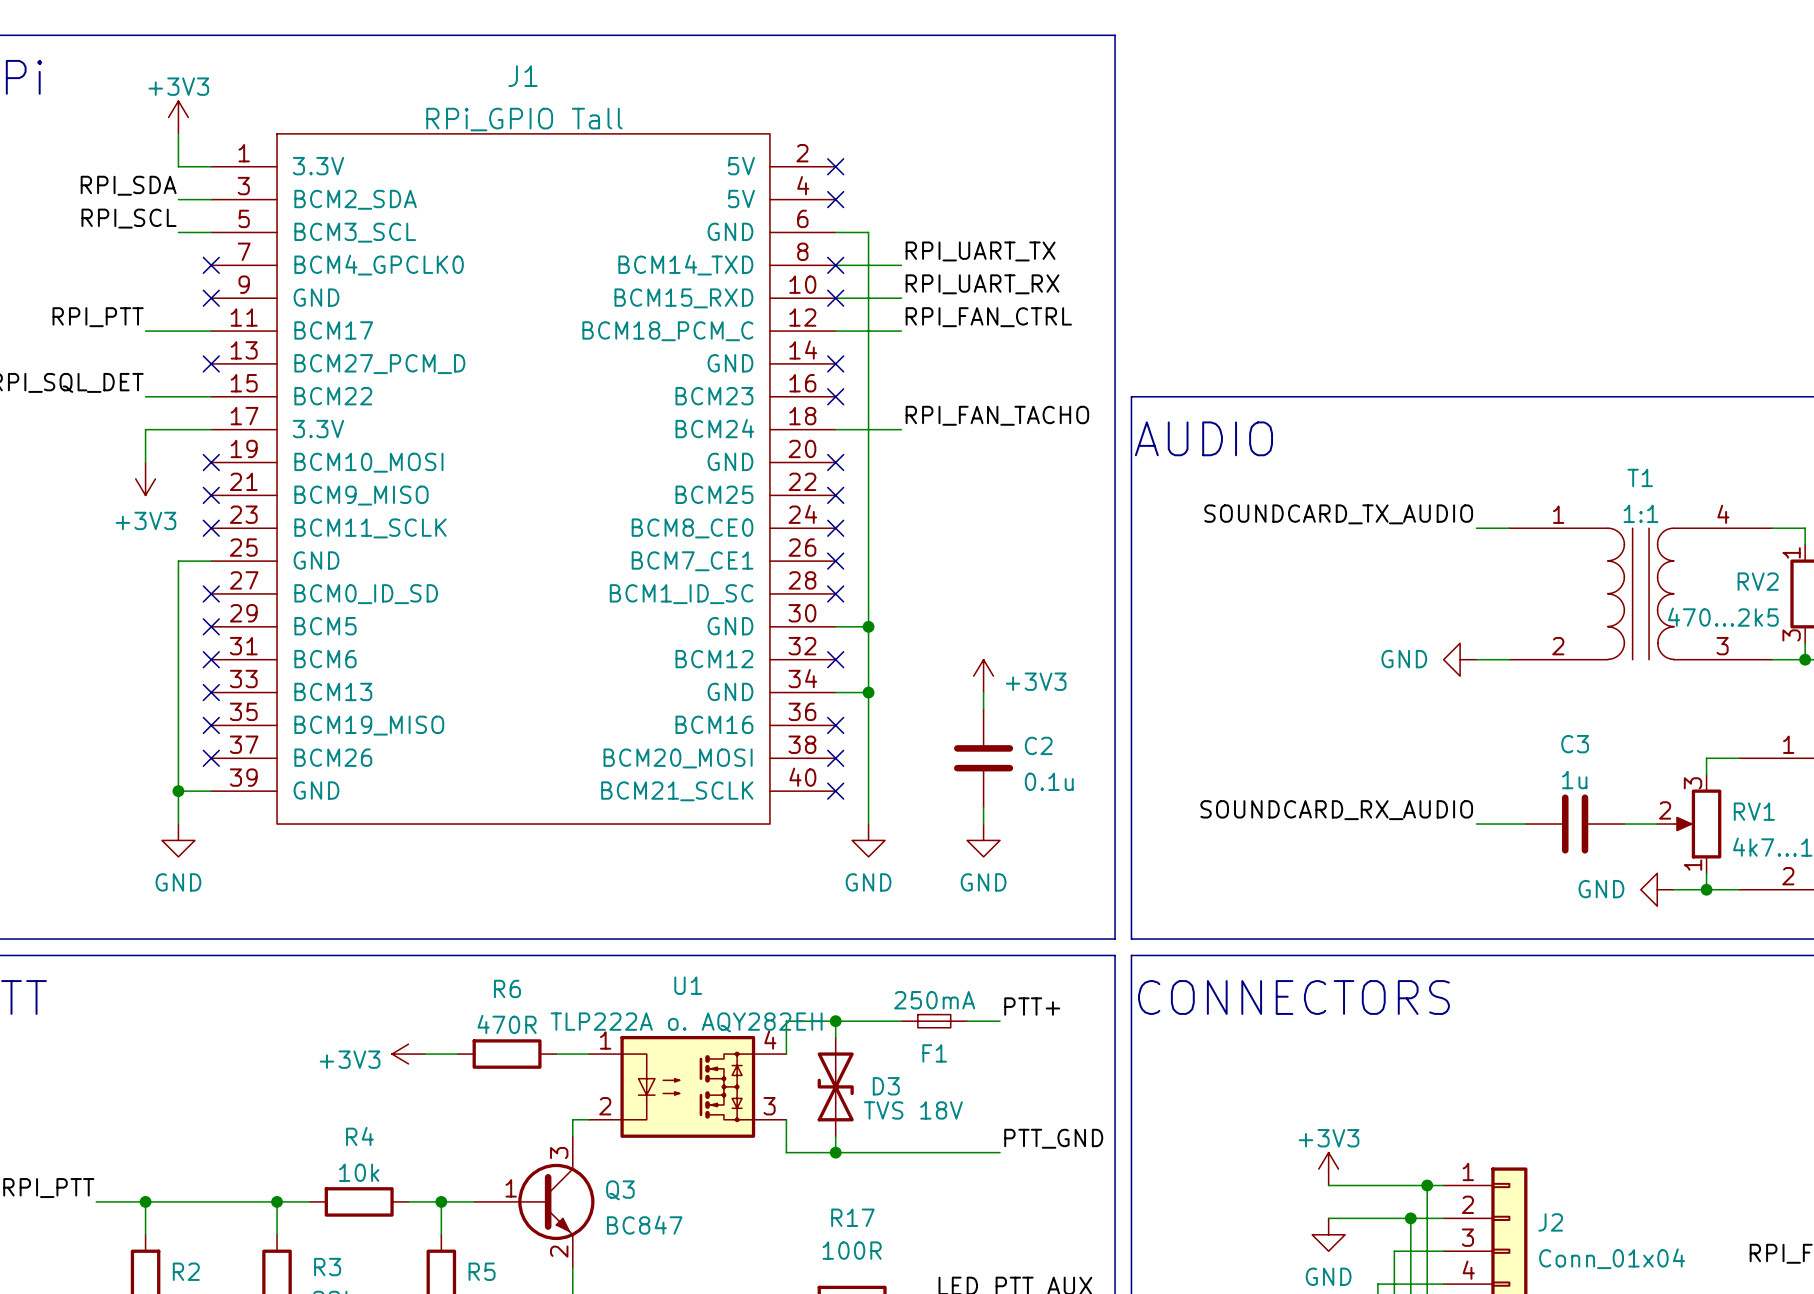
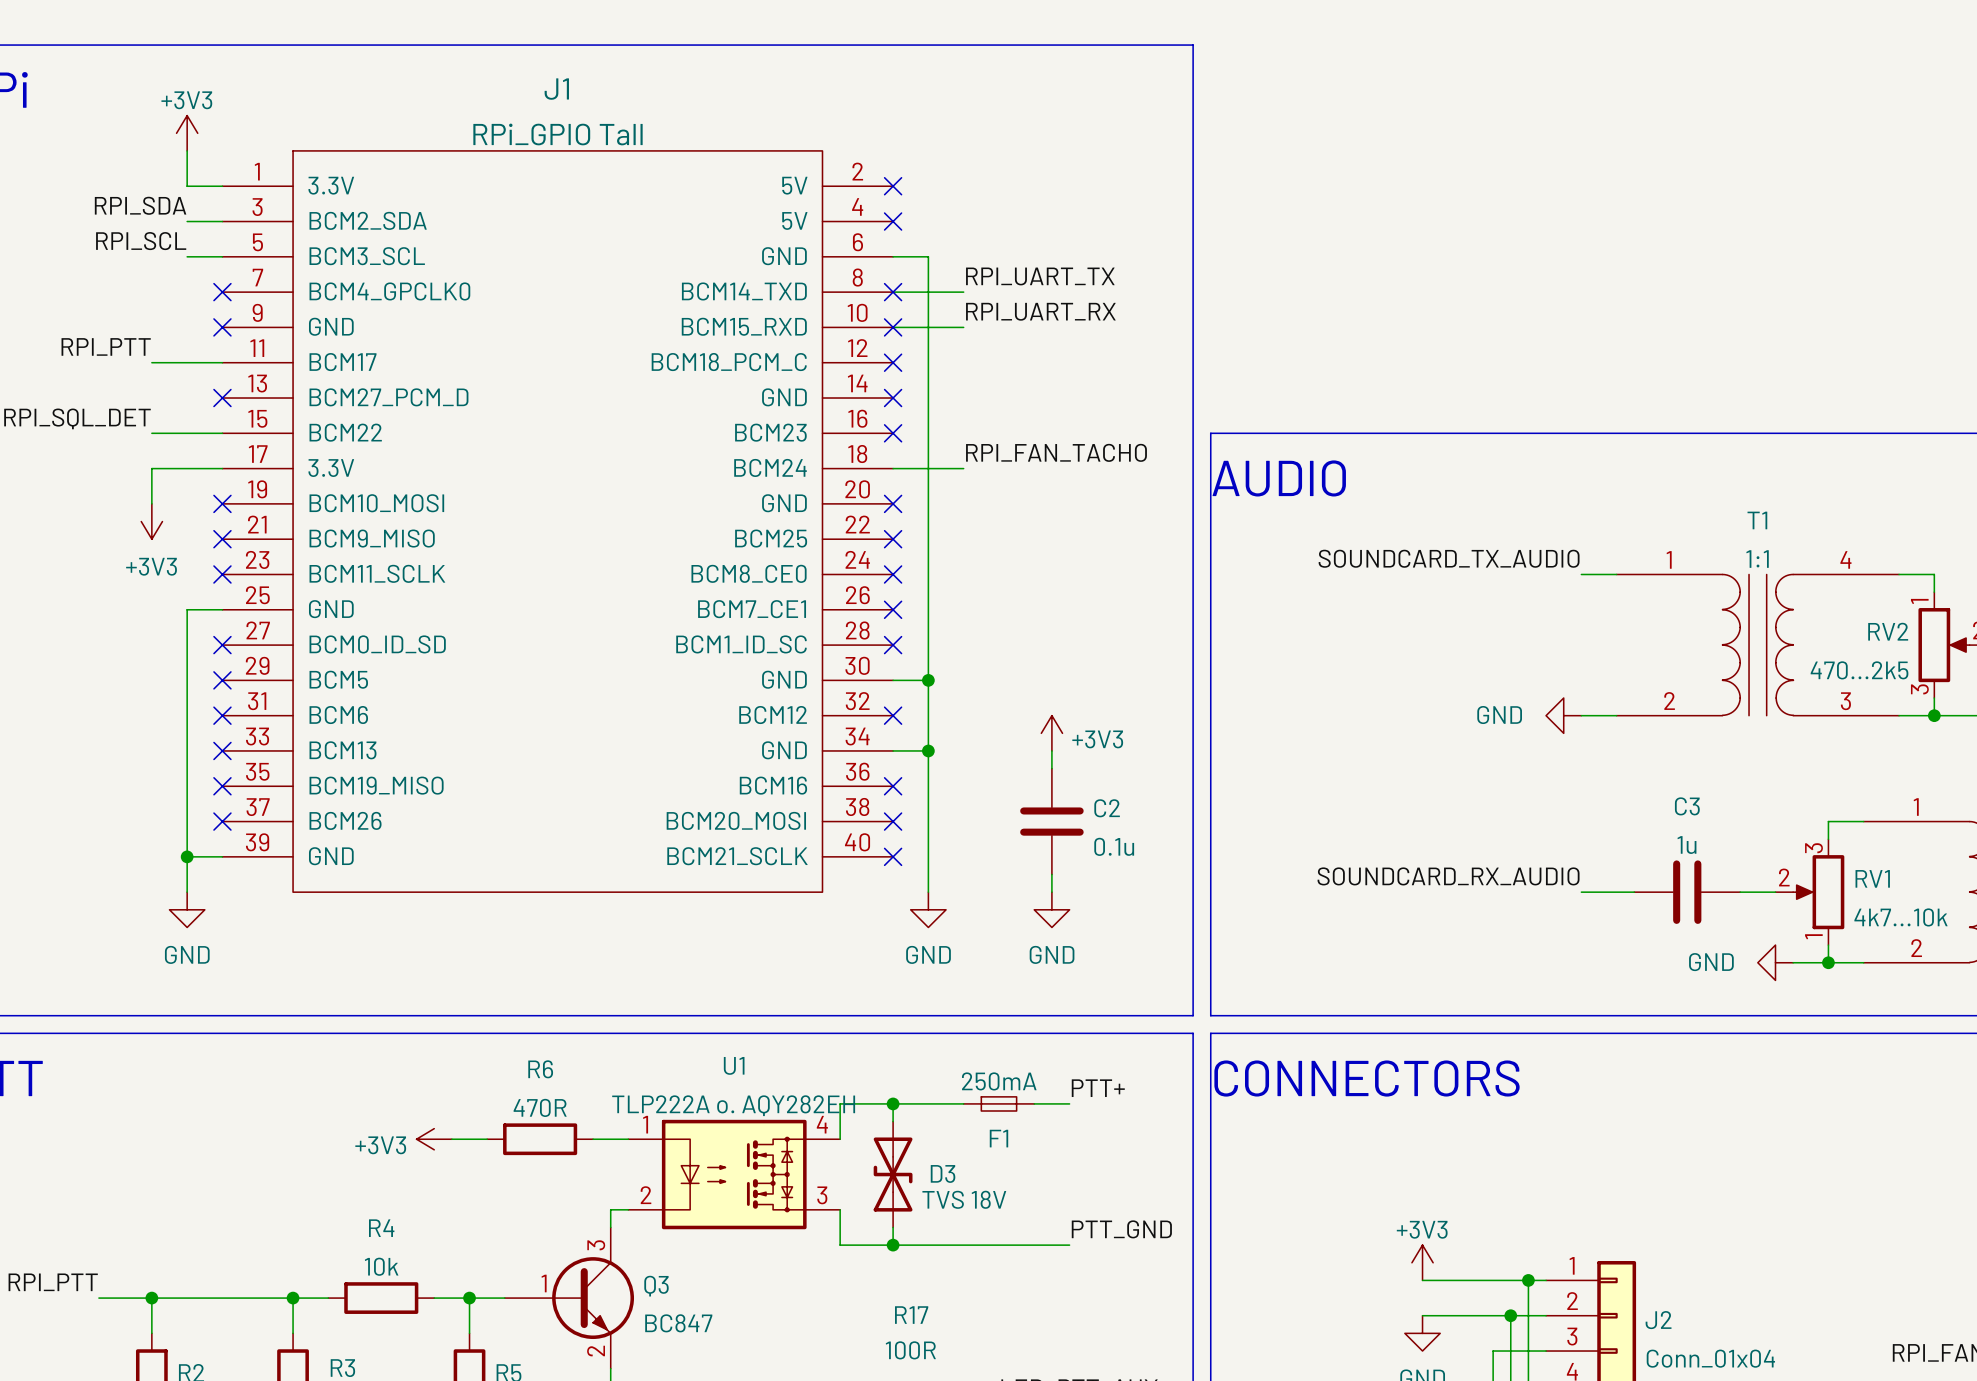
label: RPI_FAN_CTRL (988, 317) -> none
wire: (835, 331) (901, 331) -> none
no-connect mark: none -> (893, 362)

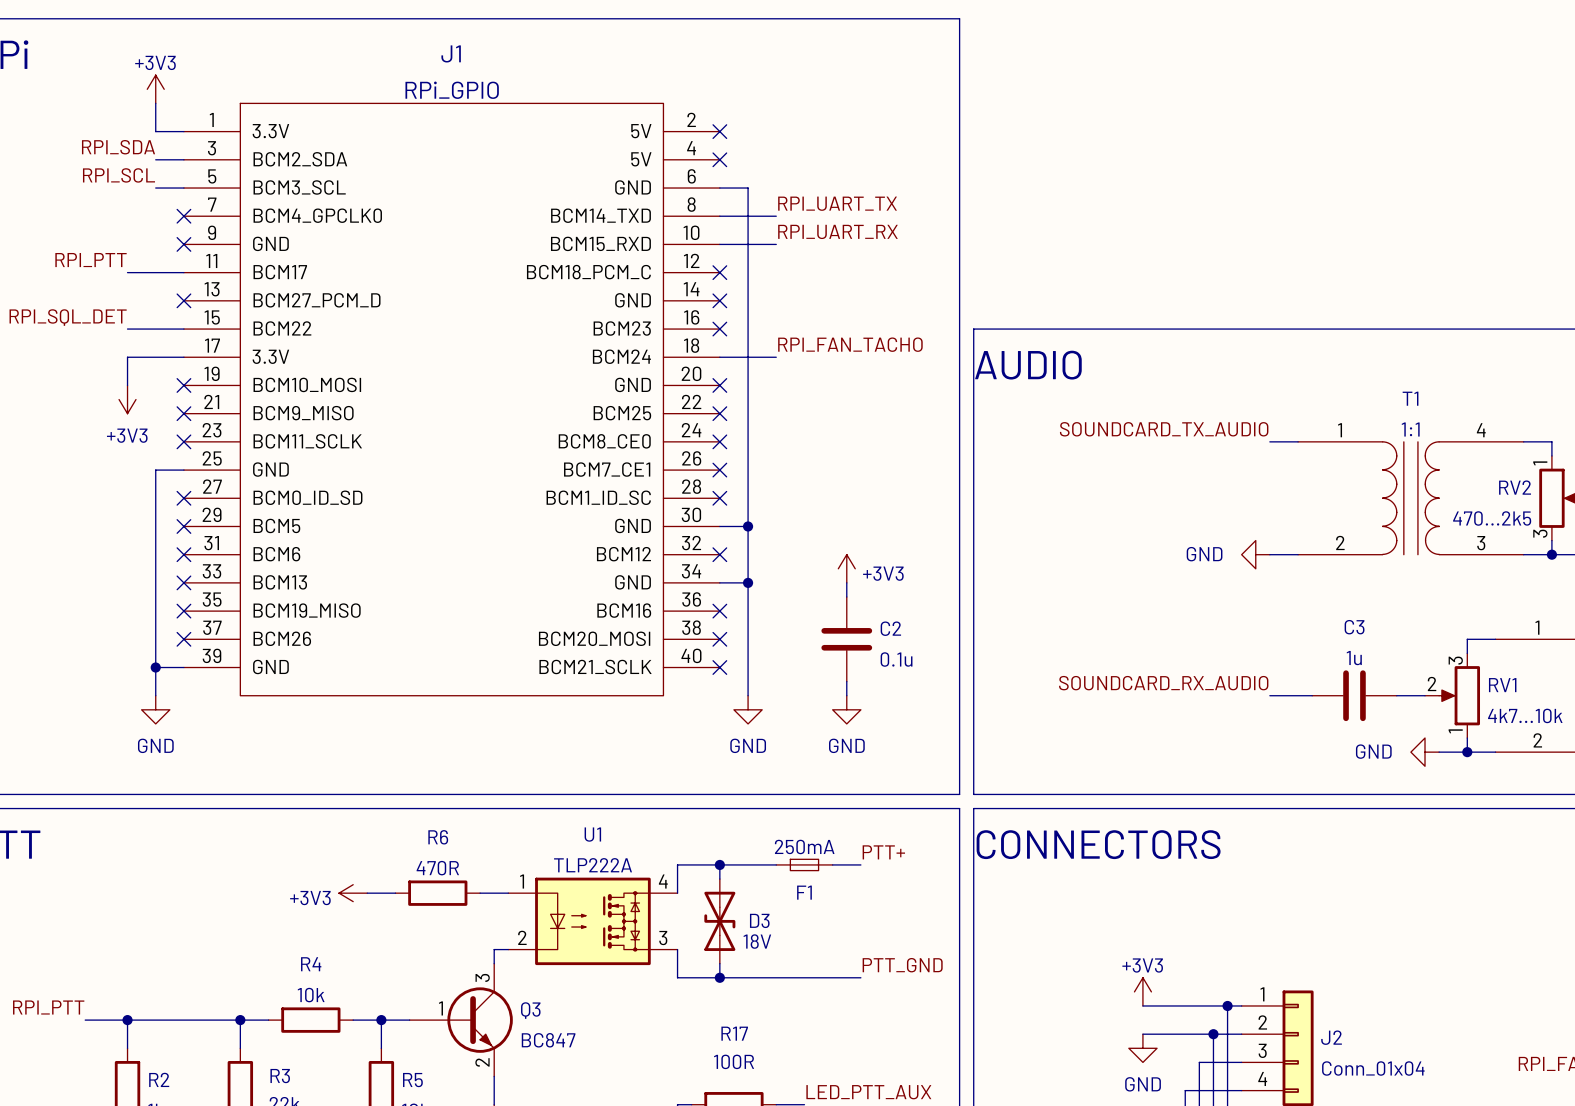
J1 value: RPi_GPIO Tall (557, 134) -> RPi_GPIO (452, 90)
no-connect mark: (893, 292) -> none
no-connect mark: (893, 327) -> none
U1 value: TLP222A o. AQY282EH (733, 1105) -> TLP222A (593, 865)
D3 value: TVS 18V (964, 1199) -> 18V (757, 941)

